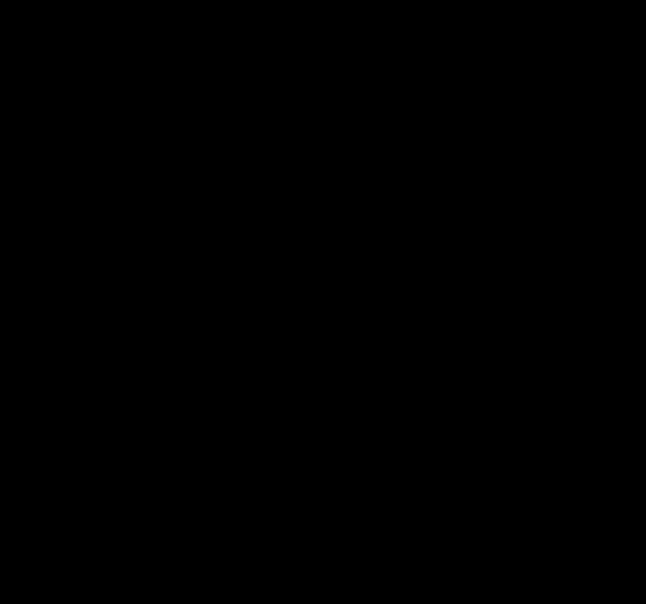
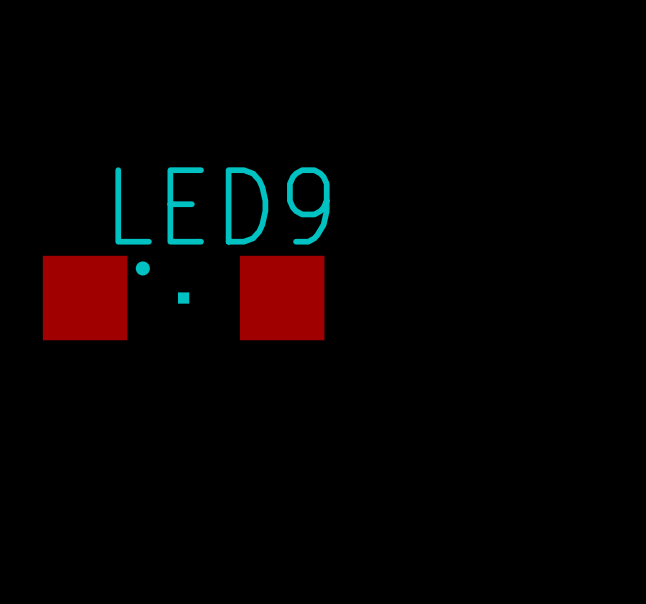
LED9: none -> (183, 298)

